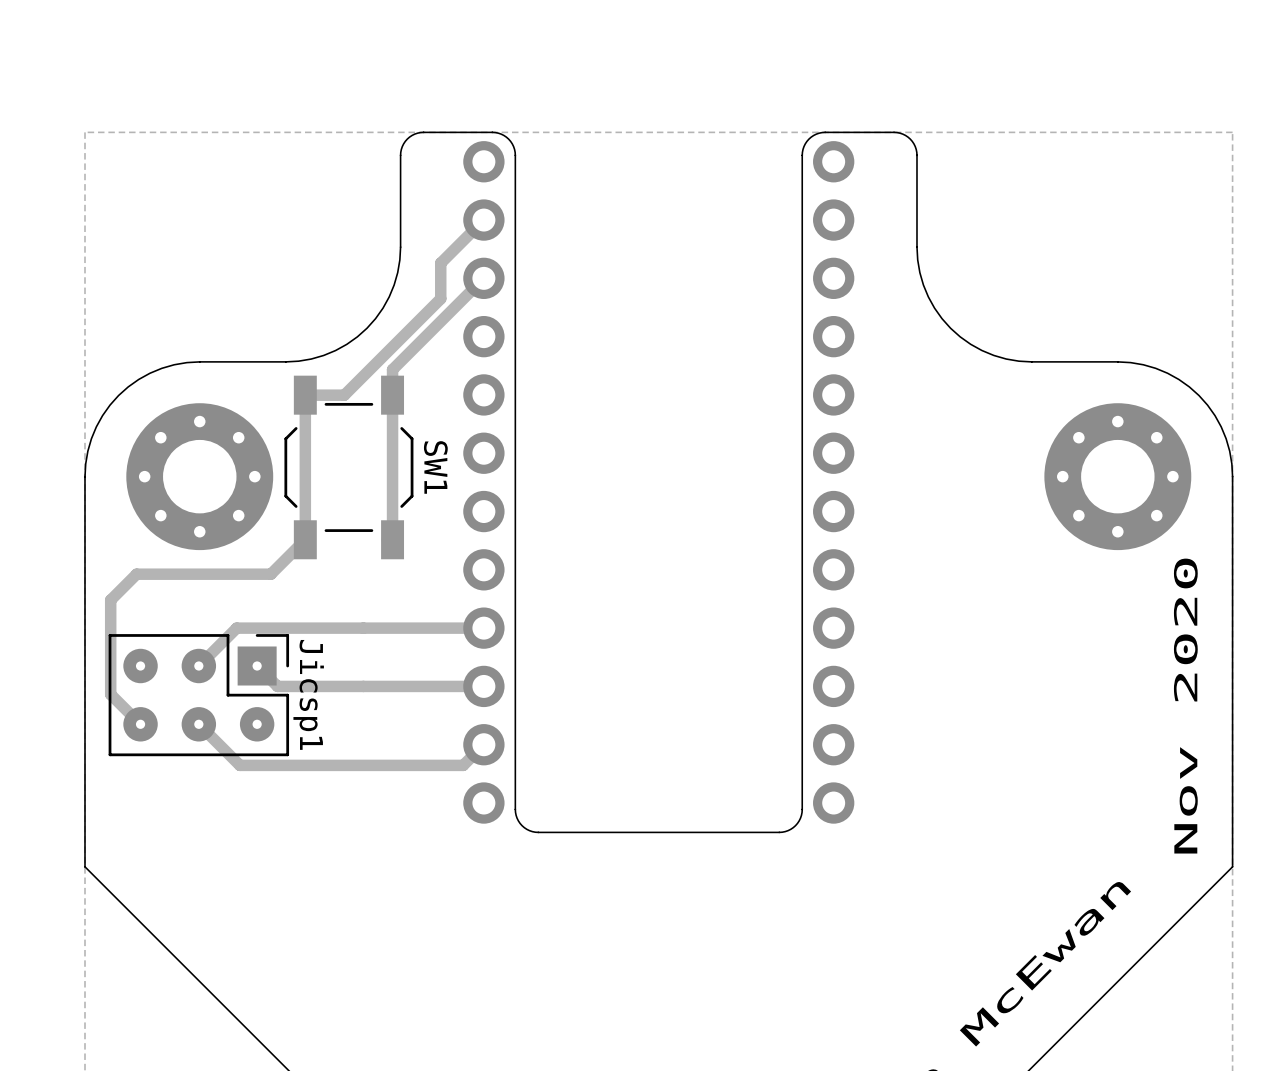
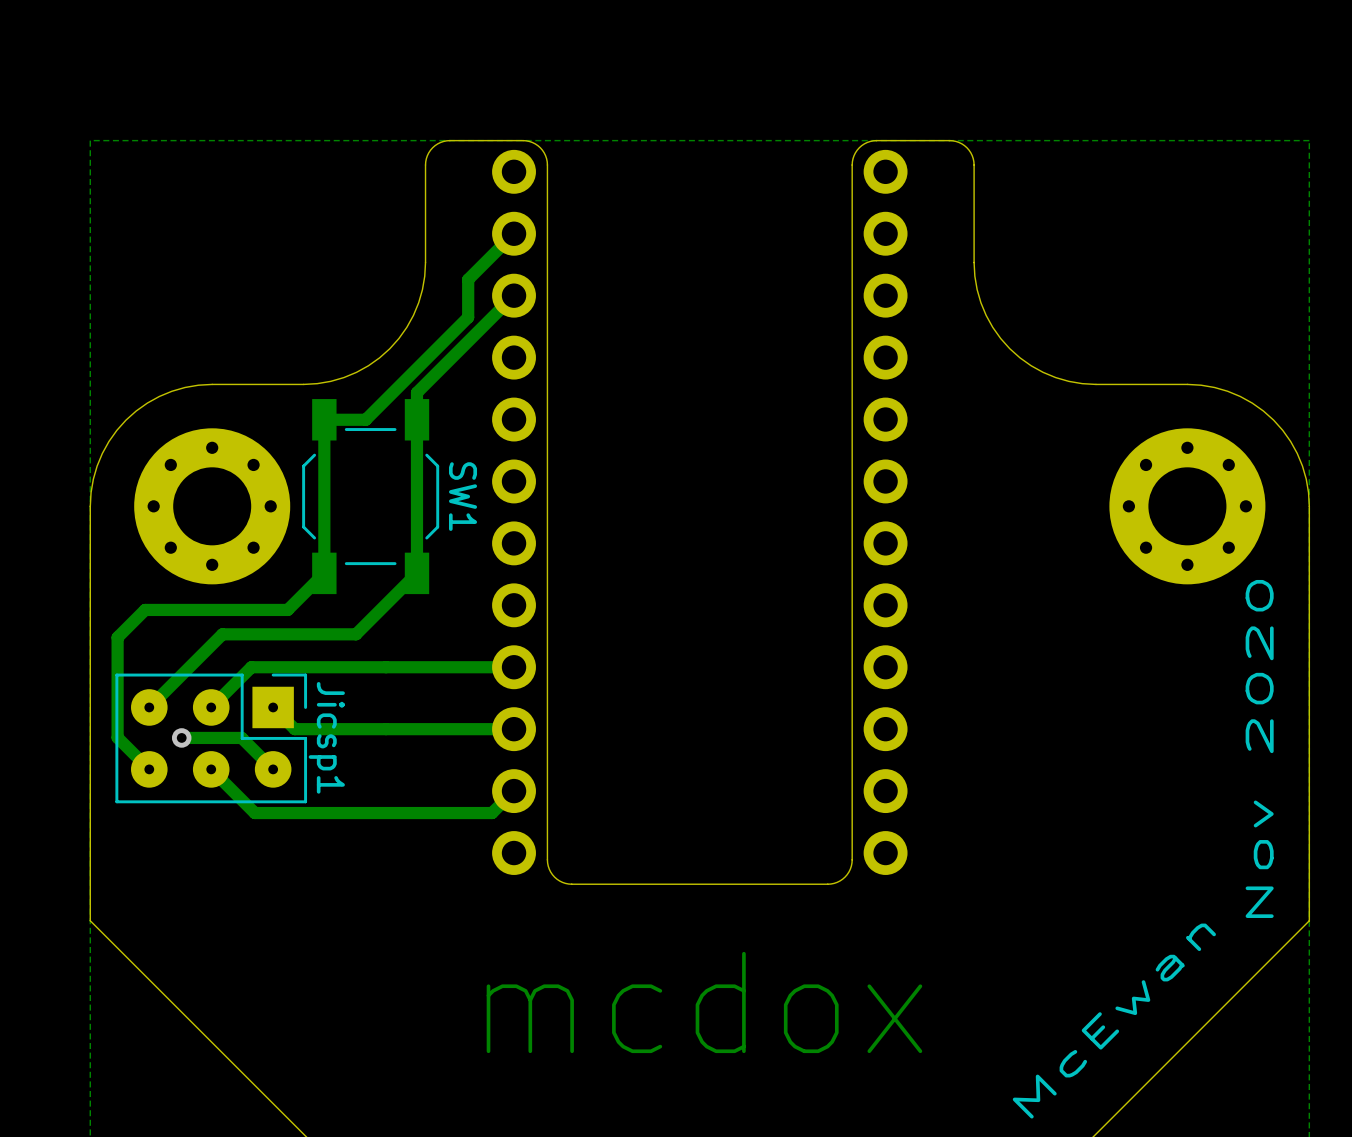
track: none -> (416, 573) (356, 634) (222, 634) (149, 707)
track: none -> (181, 737) (241, 737) (273, 769)
via: none -> (181, 737)
text: none -> mcdox (704, 1002)

